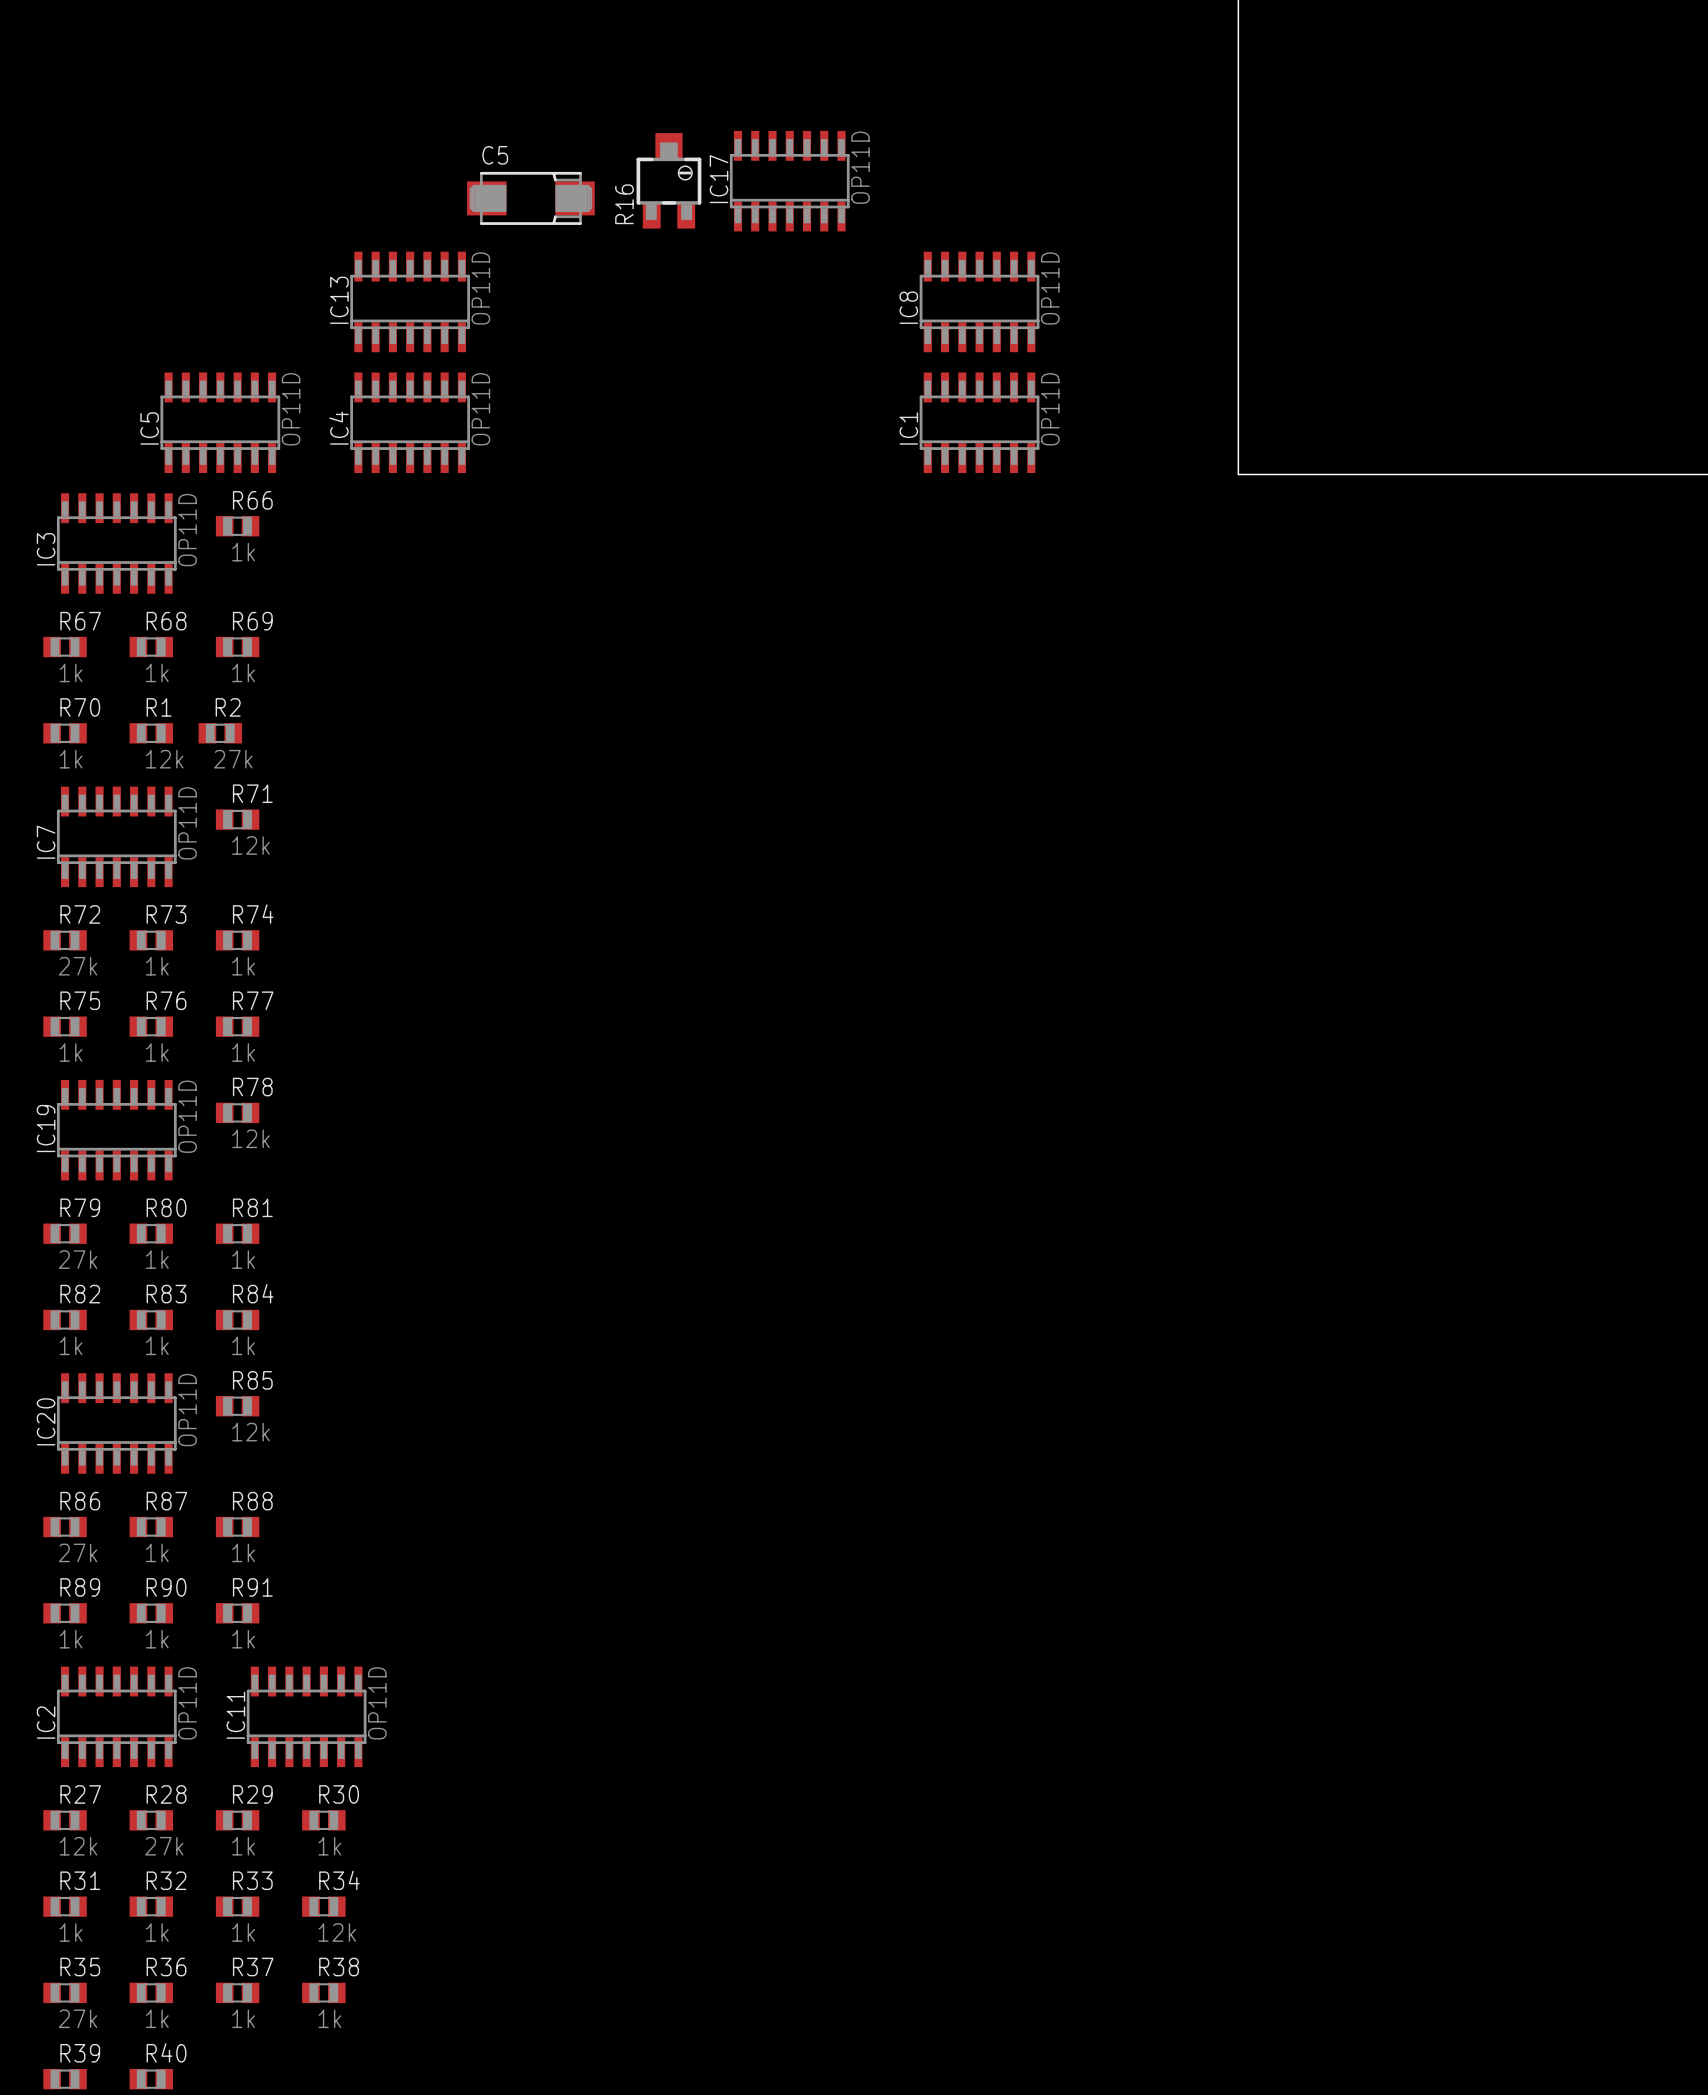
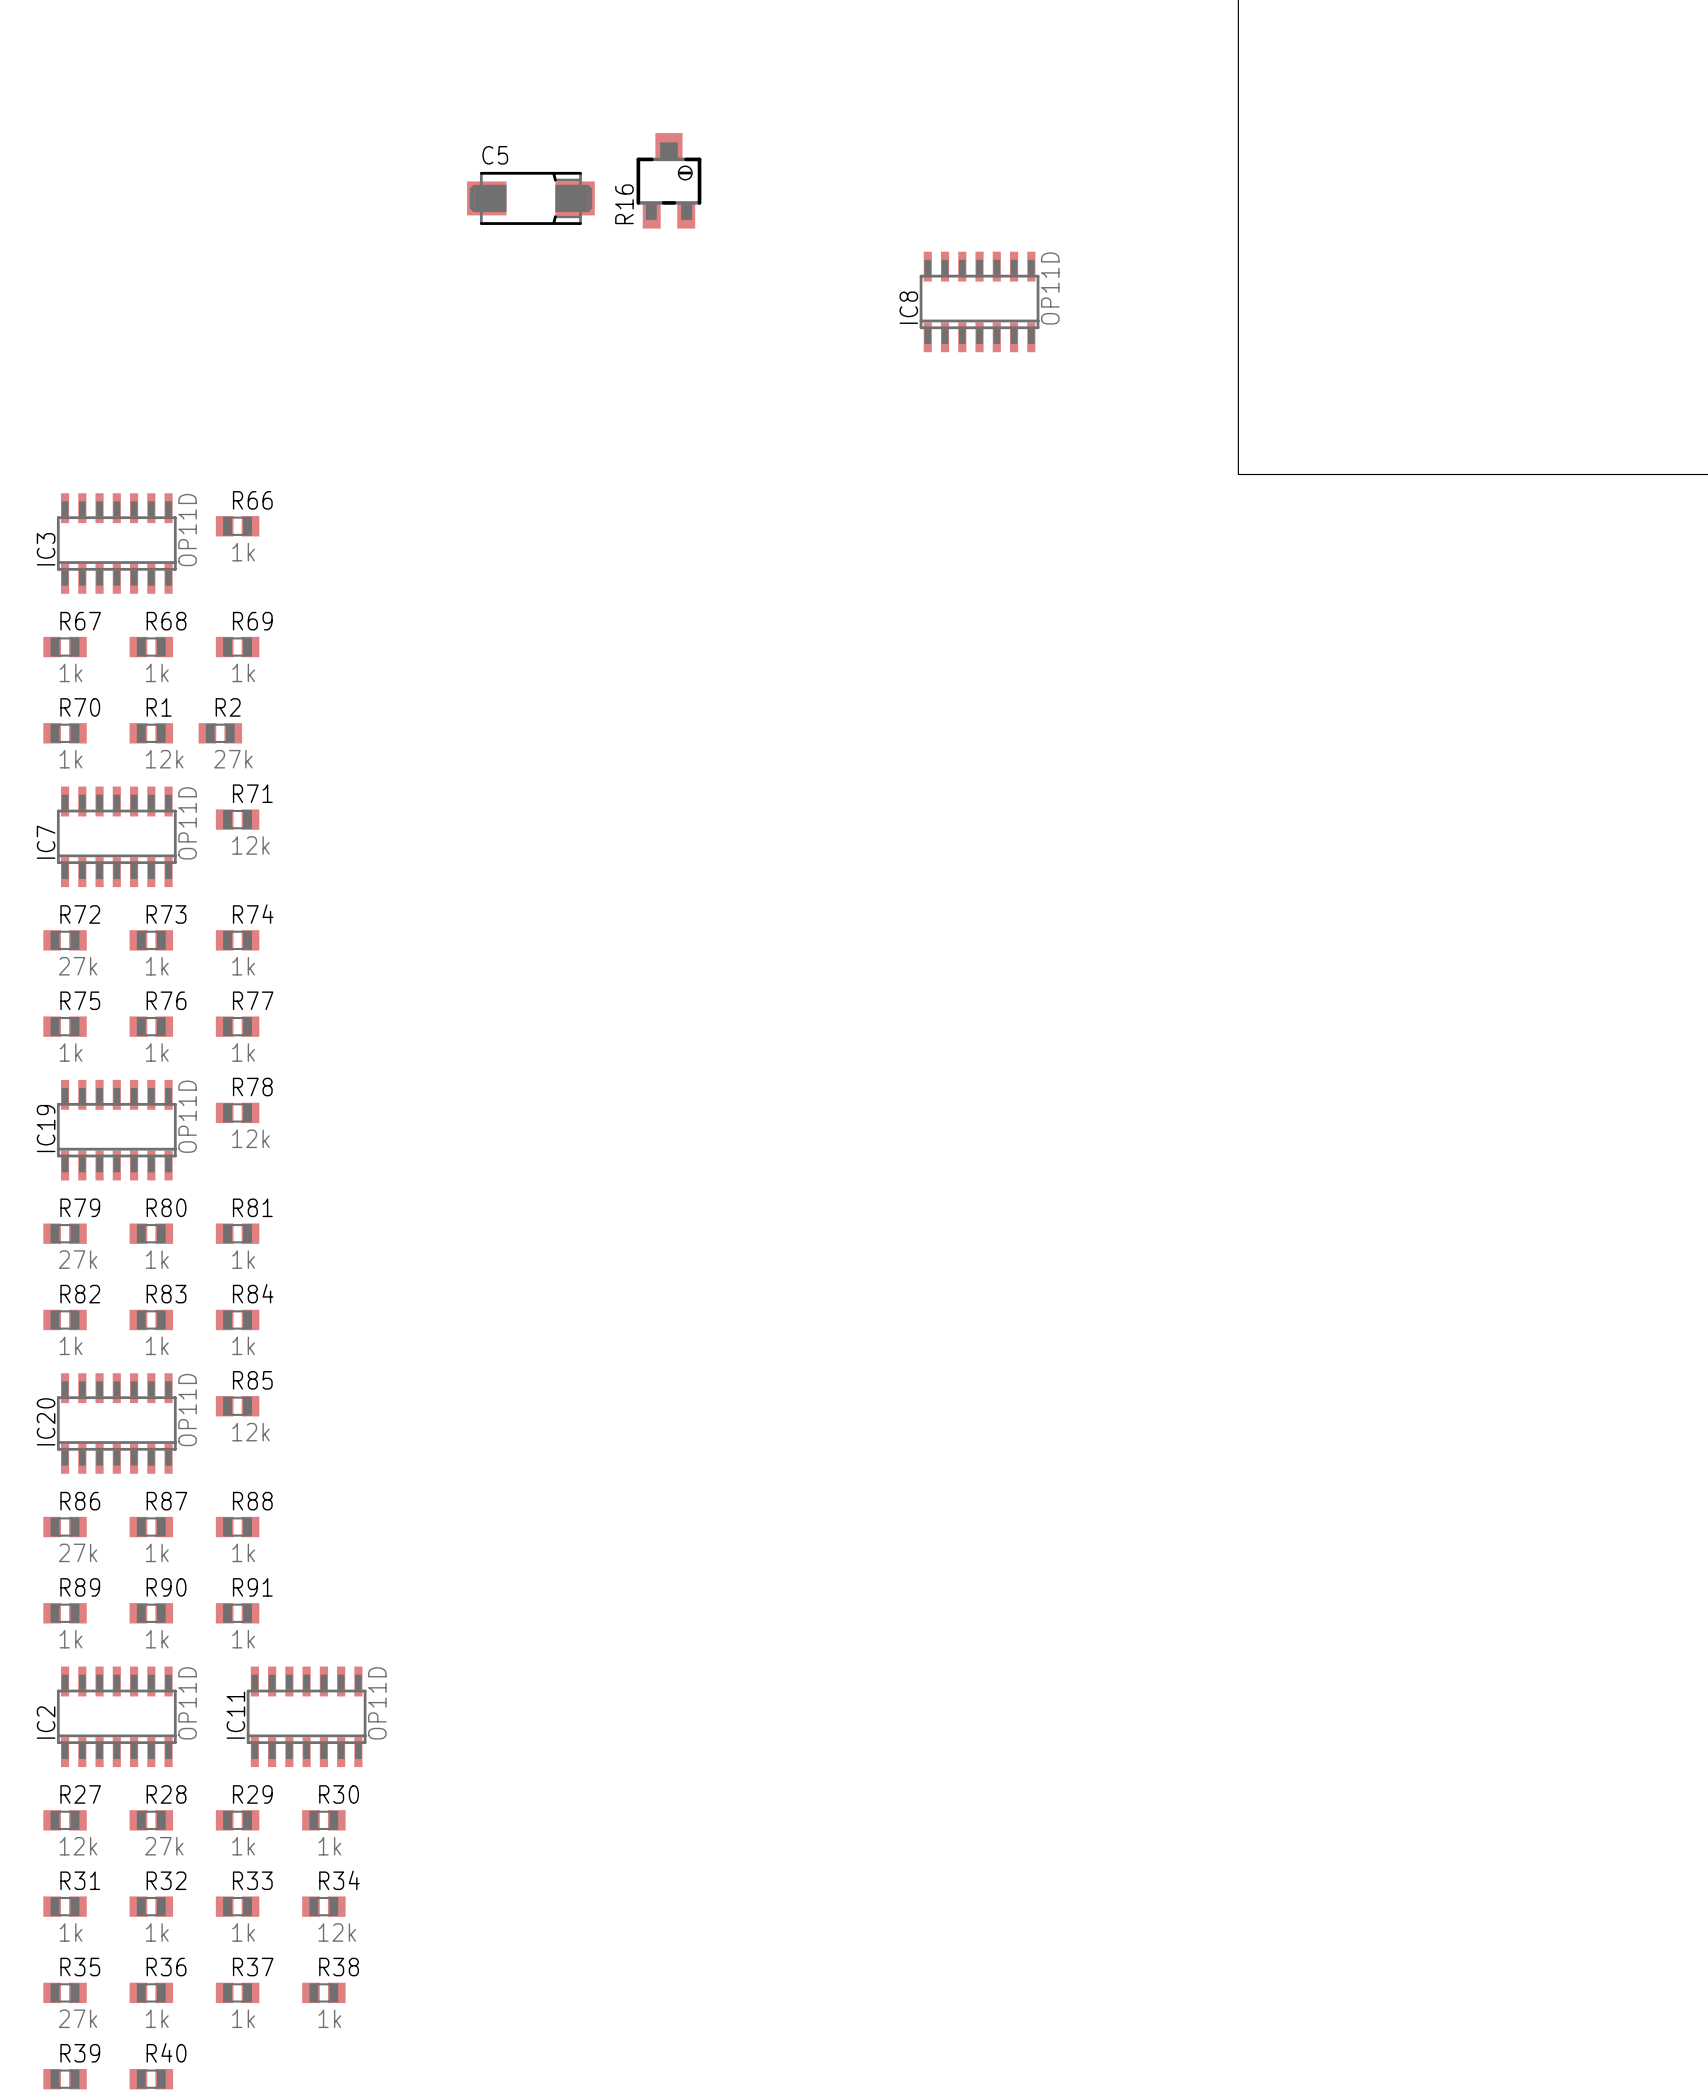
IC17: OP11D (789, 181) -> none
IC13: OP11D (410, 301) -> none
IC5: OP11D (220, 422) -> none
IC4: OP11D (410, 422) -> none
IC1: OP11D (979, 422) -> none

